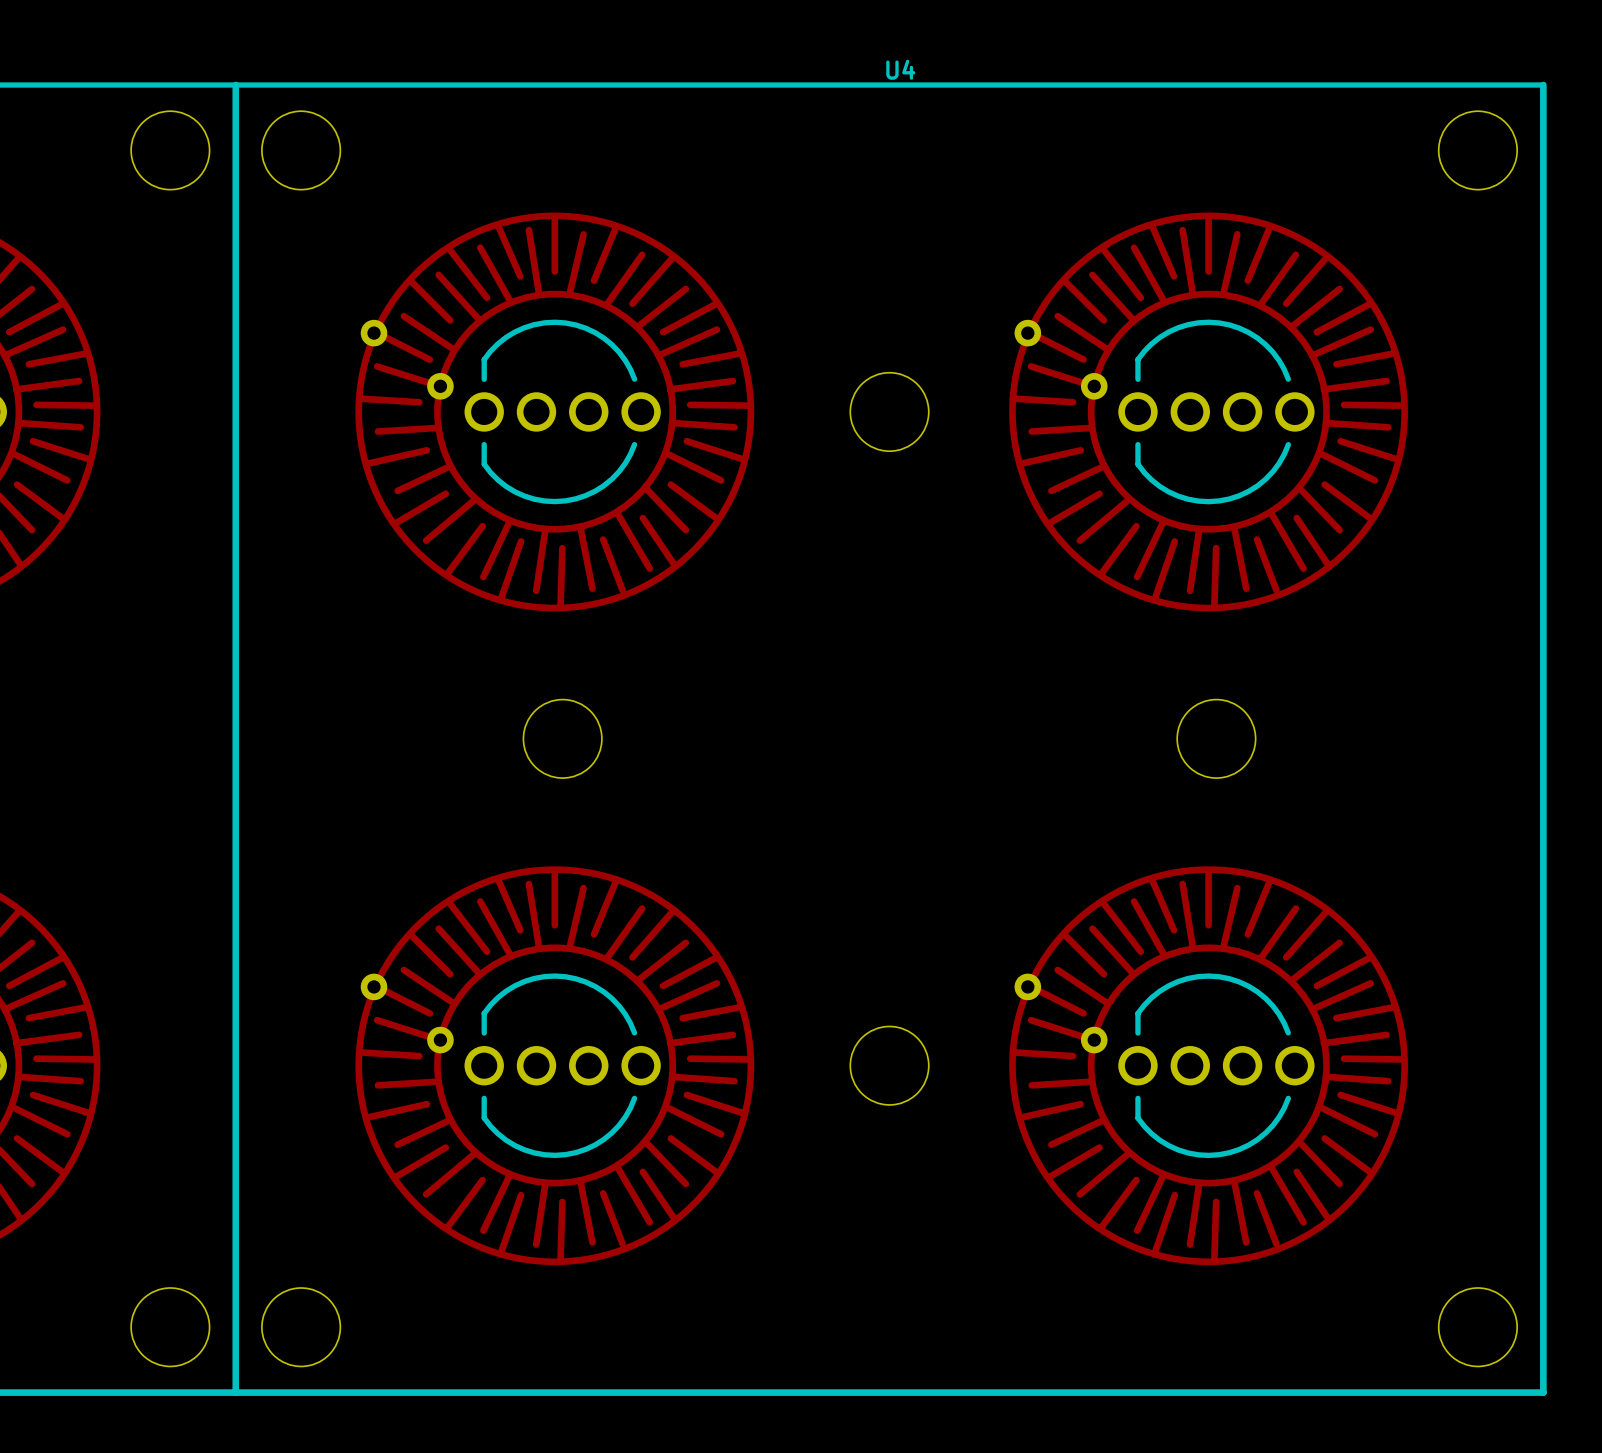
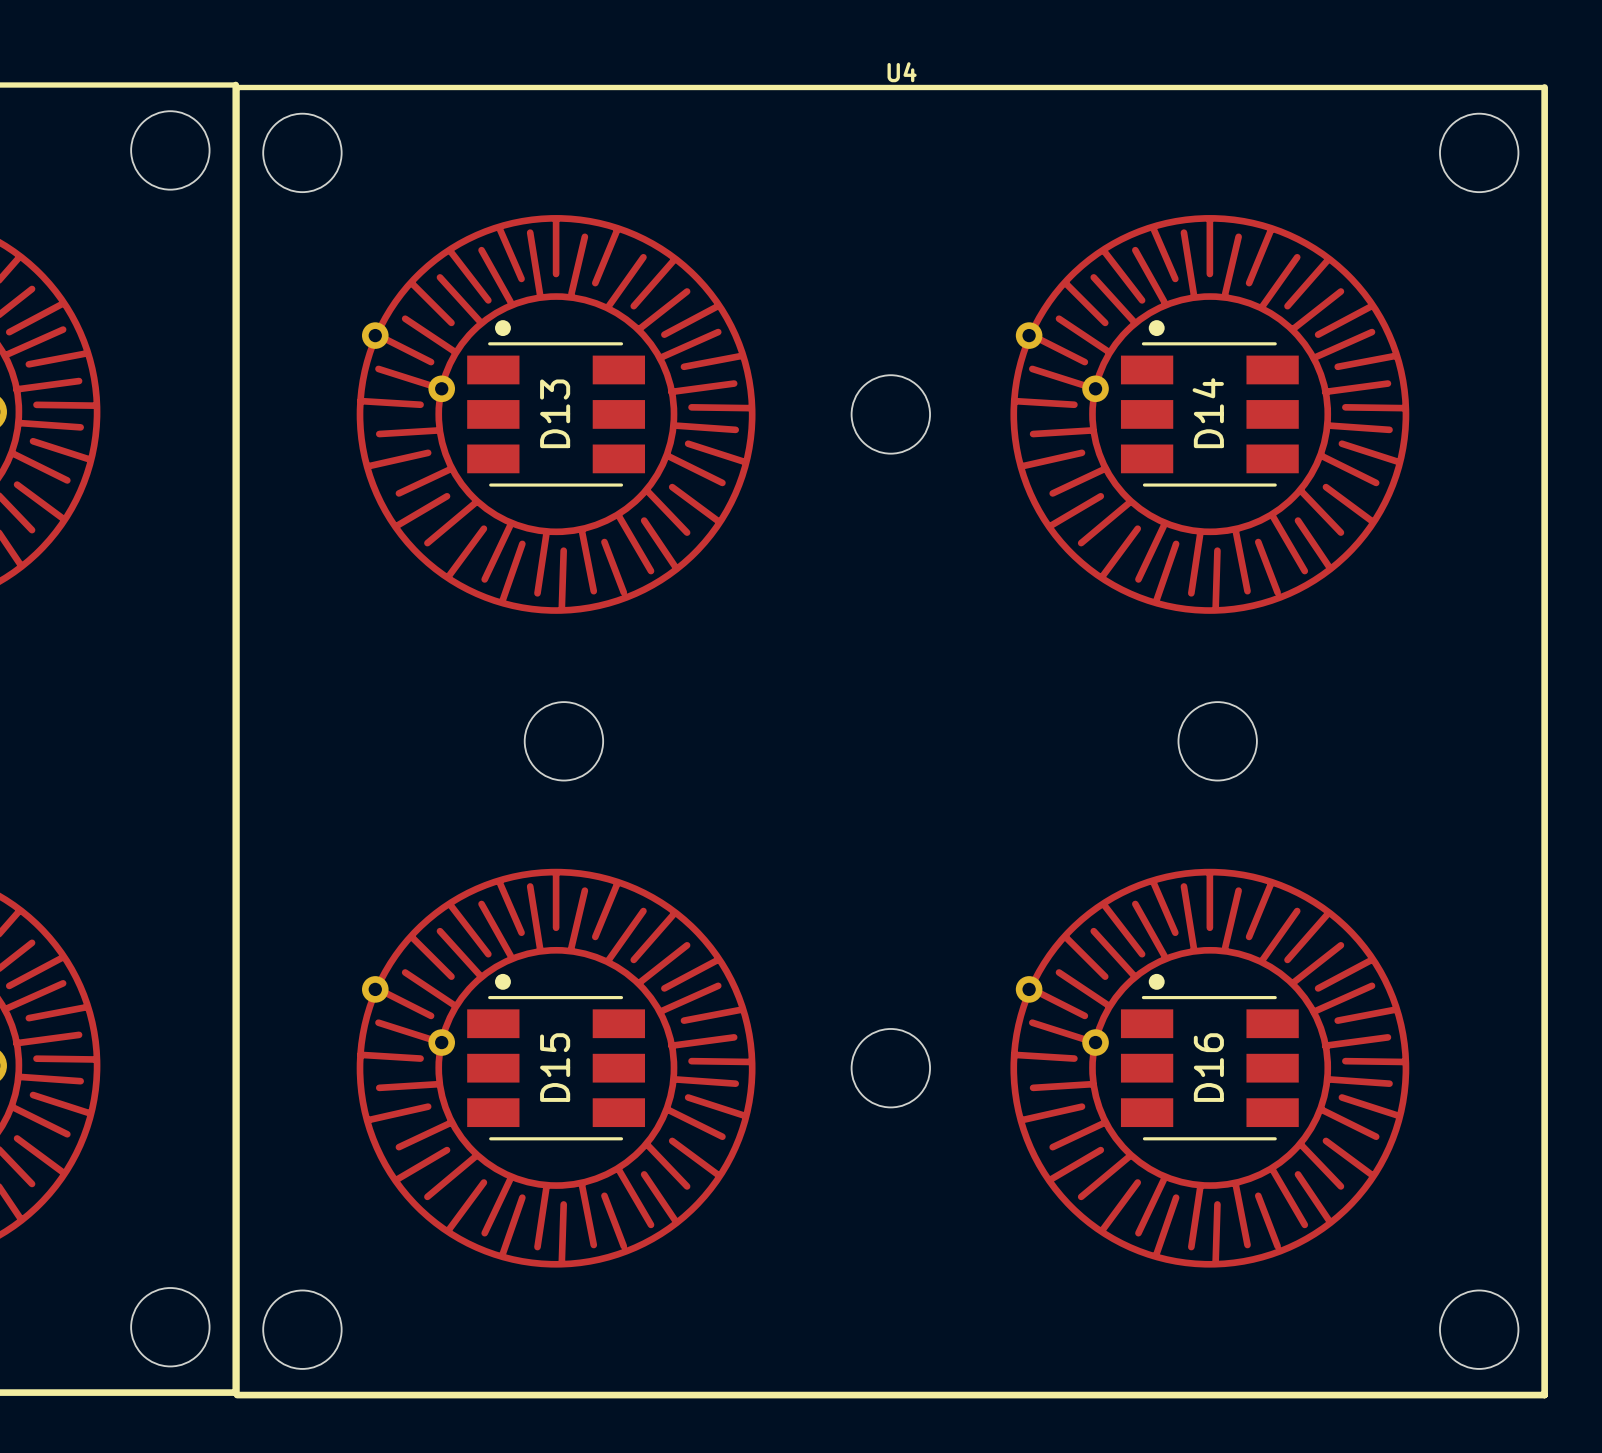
U4 footprint: [232, 81, 1547, 1396] -> [233, 84, 1548, 1399]
D13: none -> (556, 403)
D14: none -> (1209, 403)
D15: none -> (556, 1057)
D16: none -> (1209, 1057)

